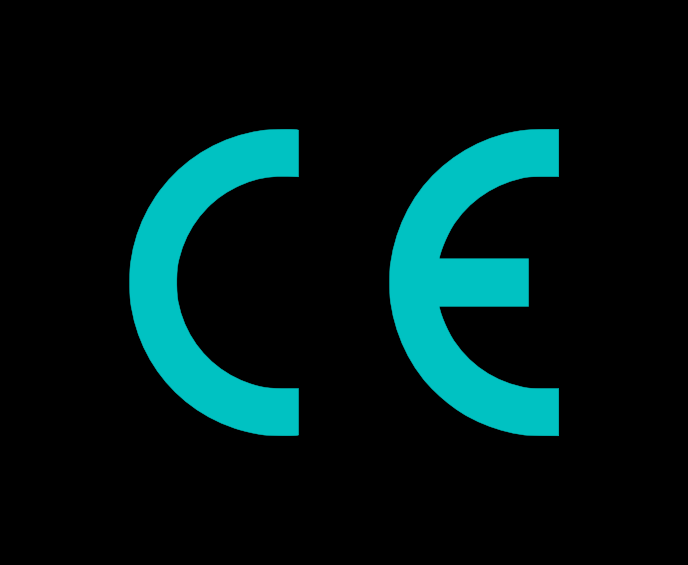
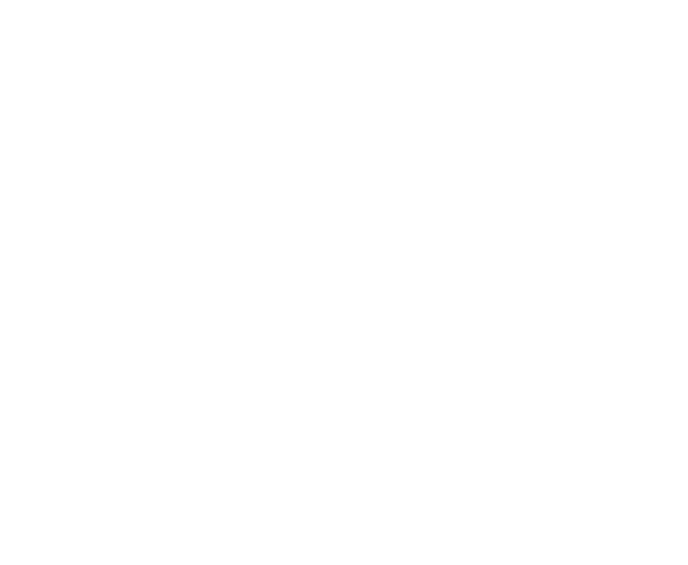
drawing: [129, 129, 559, 437] -> none

